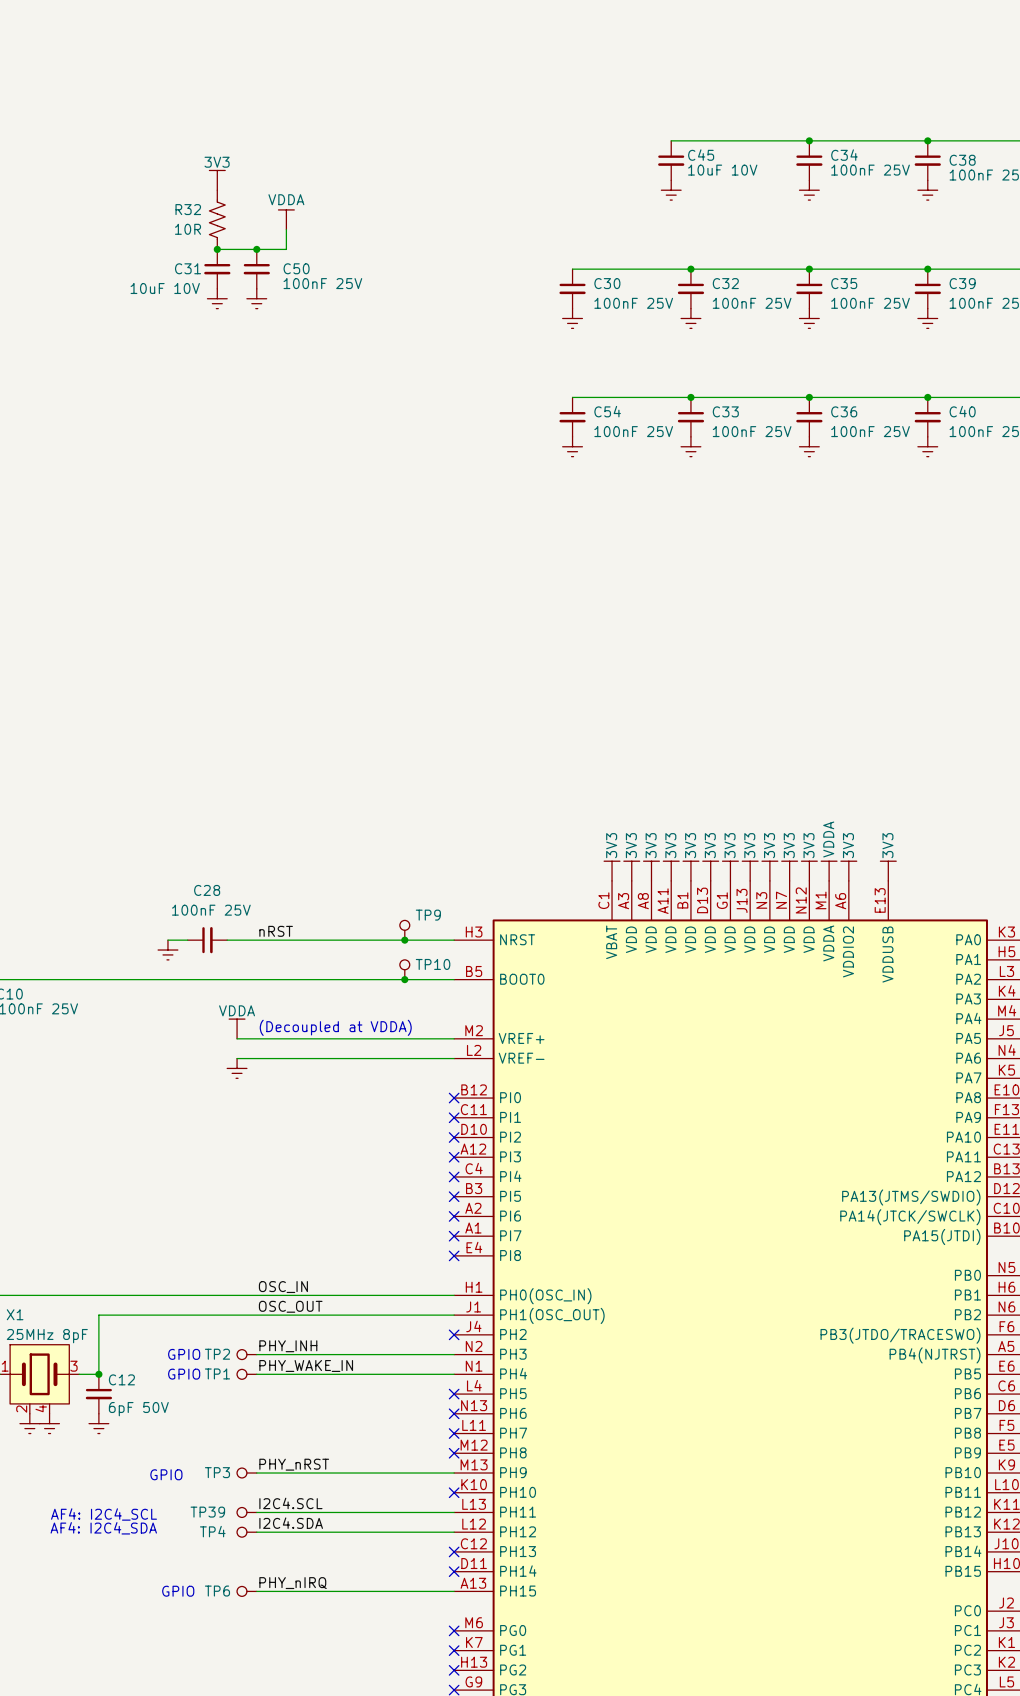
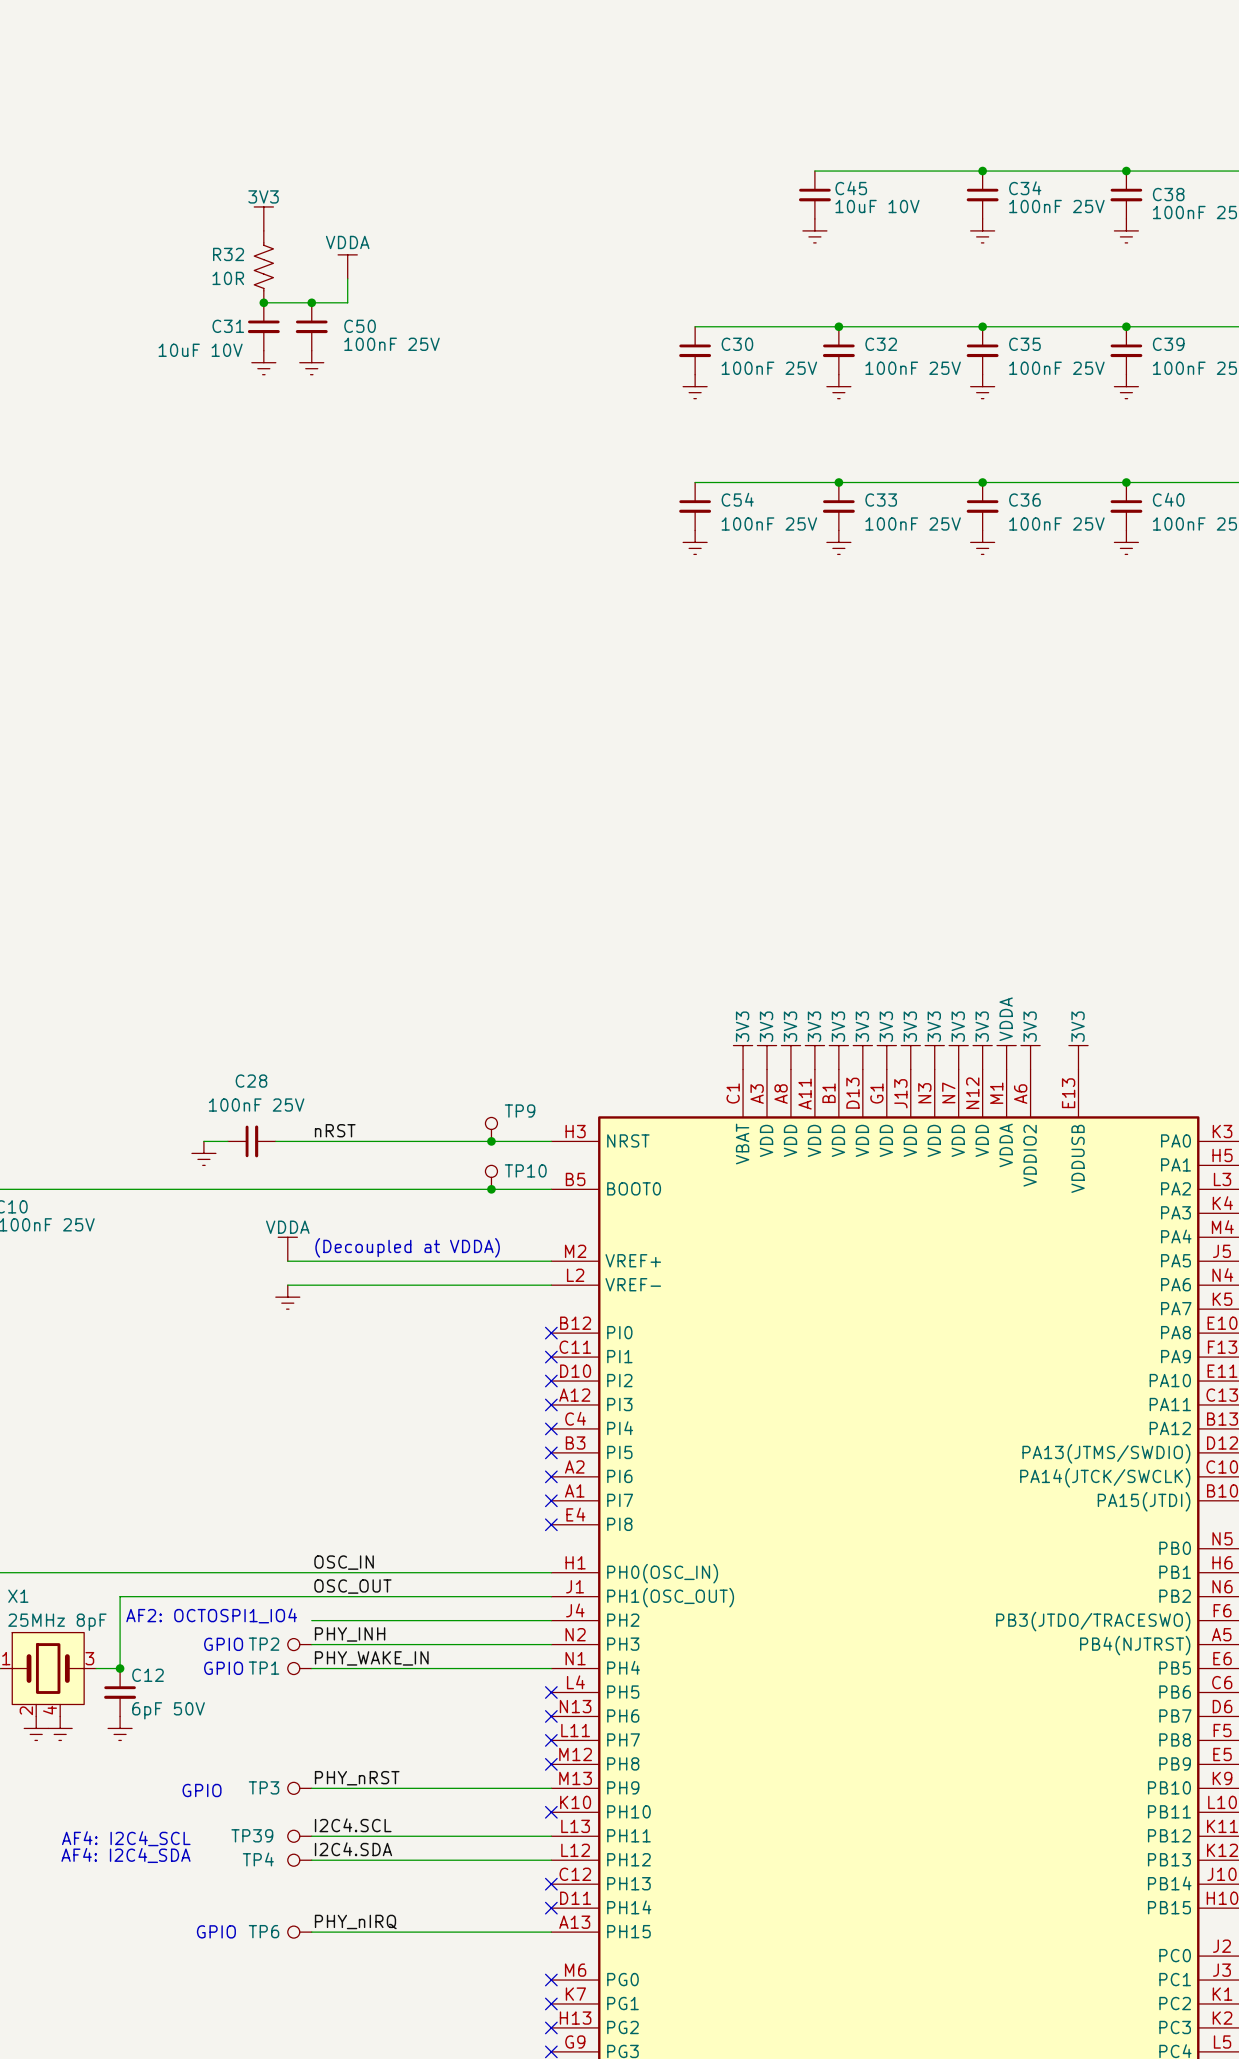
text: none -> AF2: OCTOSPI1_IO4 (211, 1615)
wire: none -> (311, 1620) (551, 1620)
no-connect mark: (454, 1334) -> none

